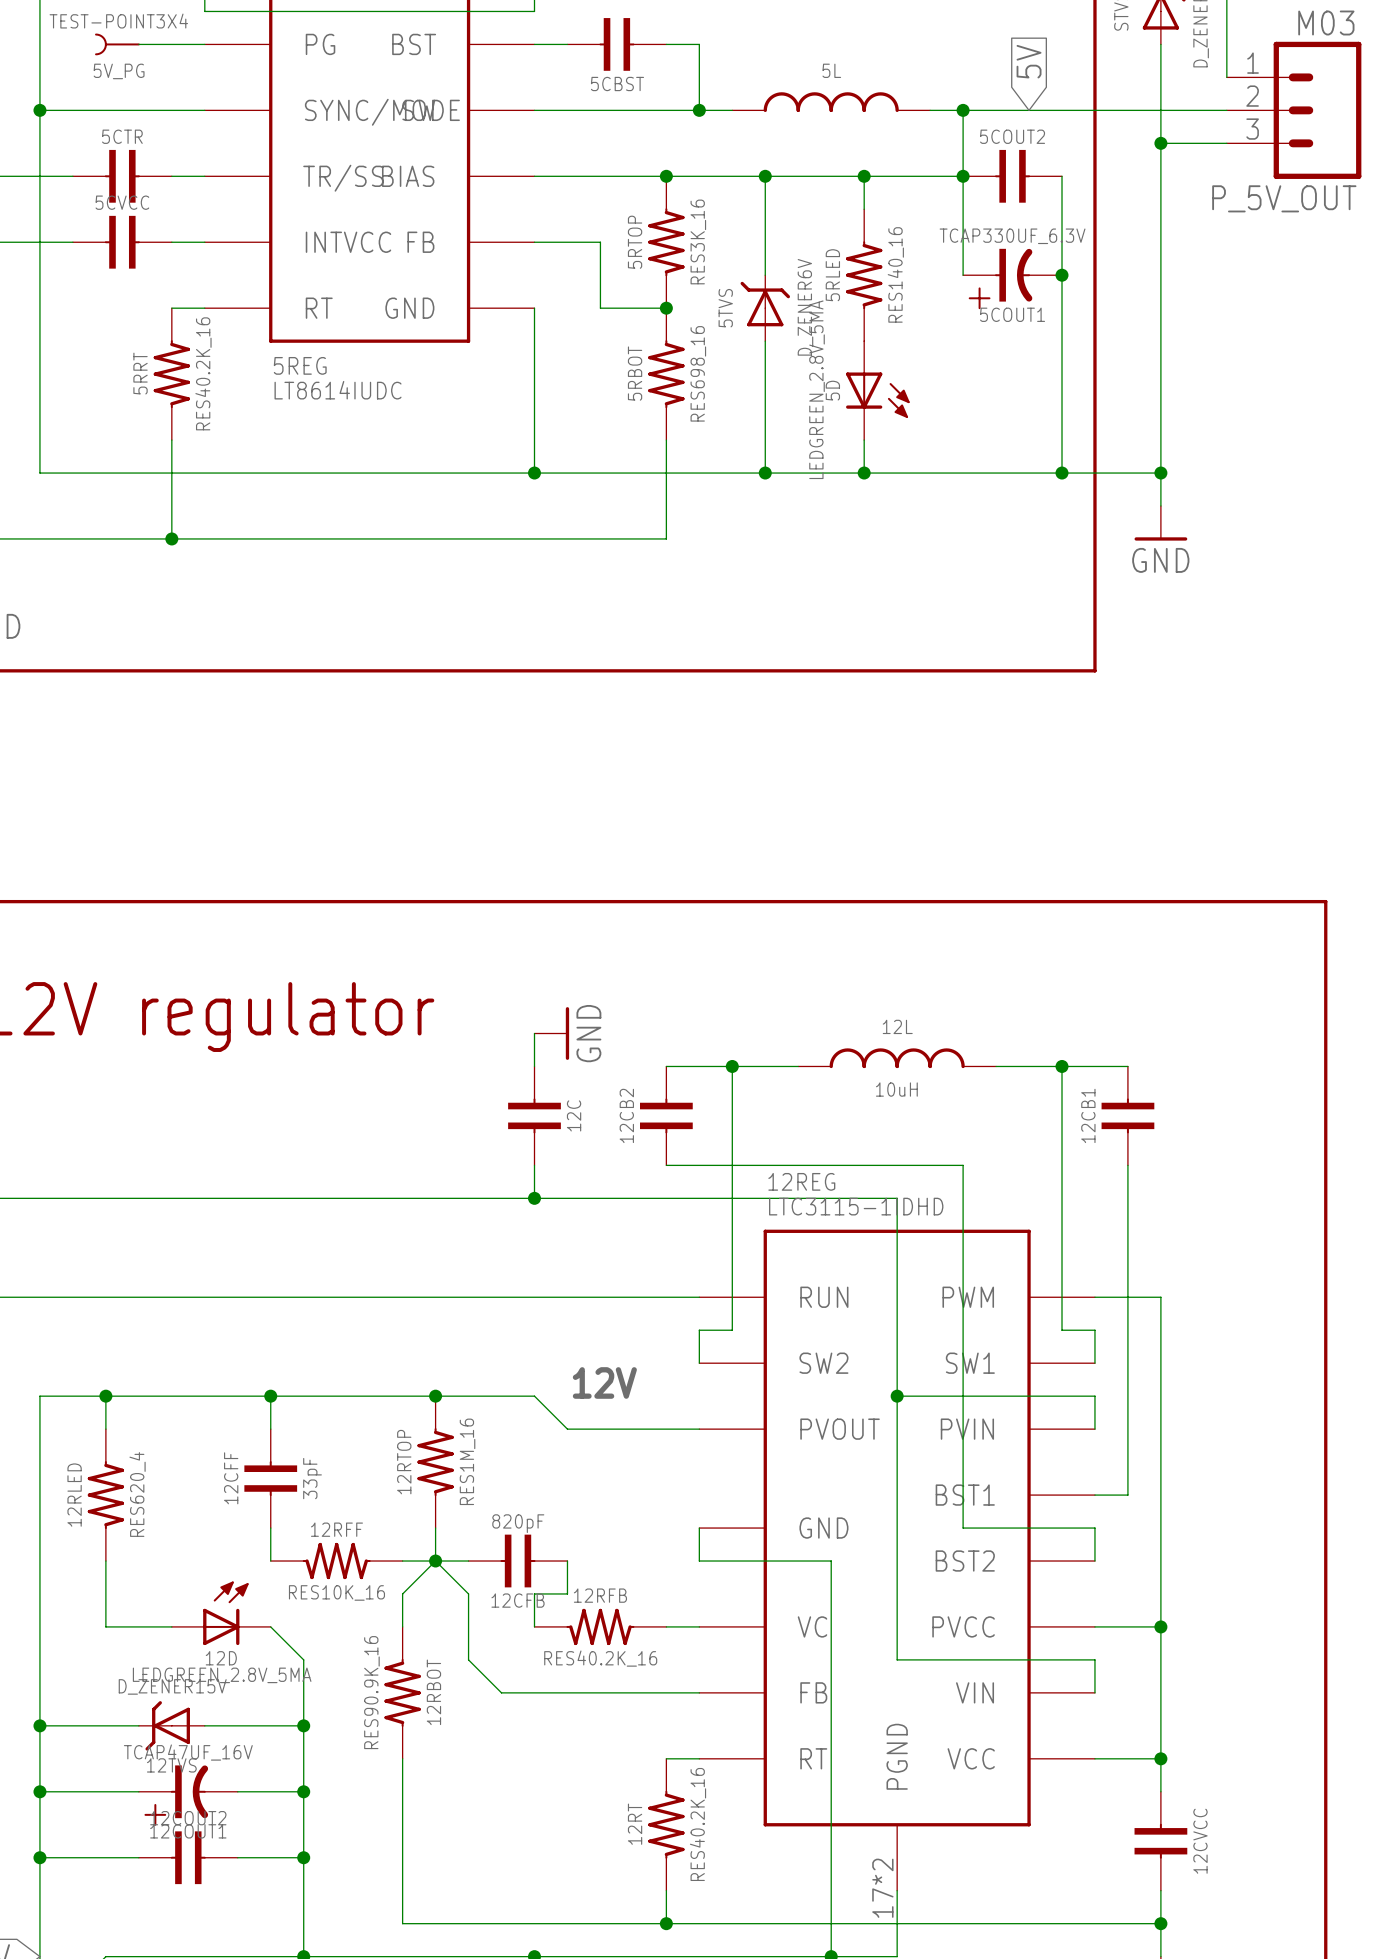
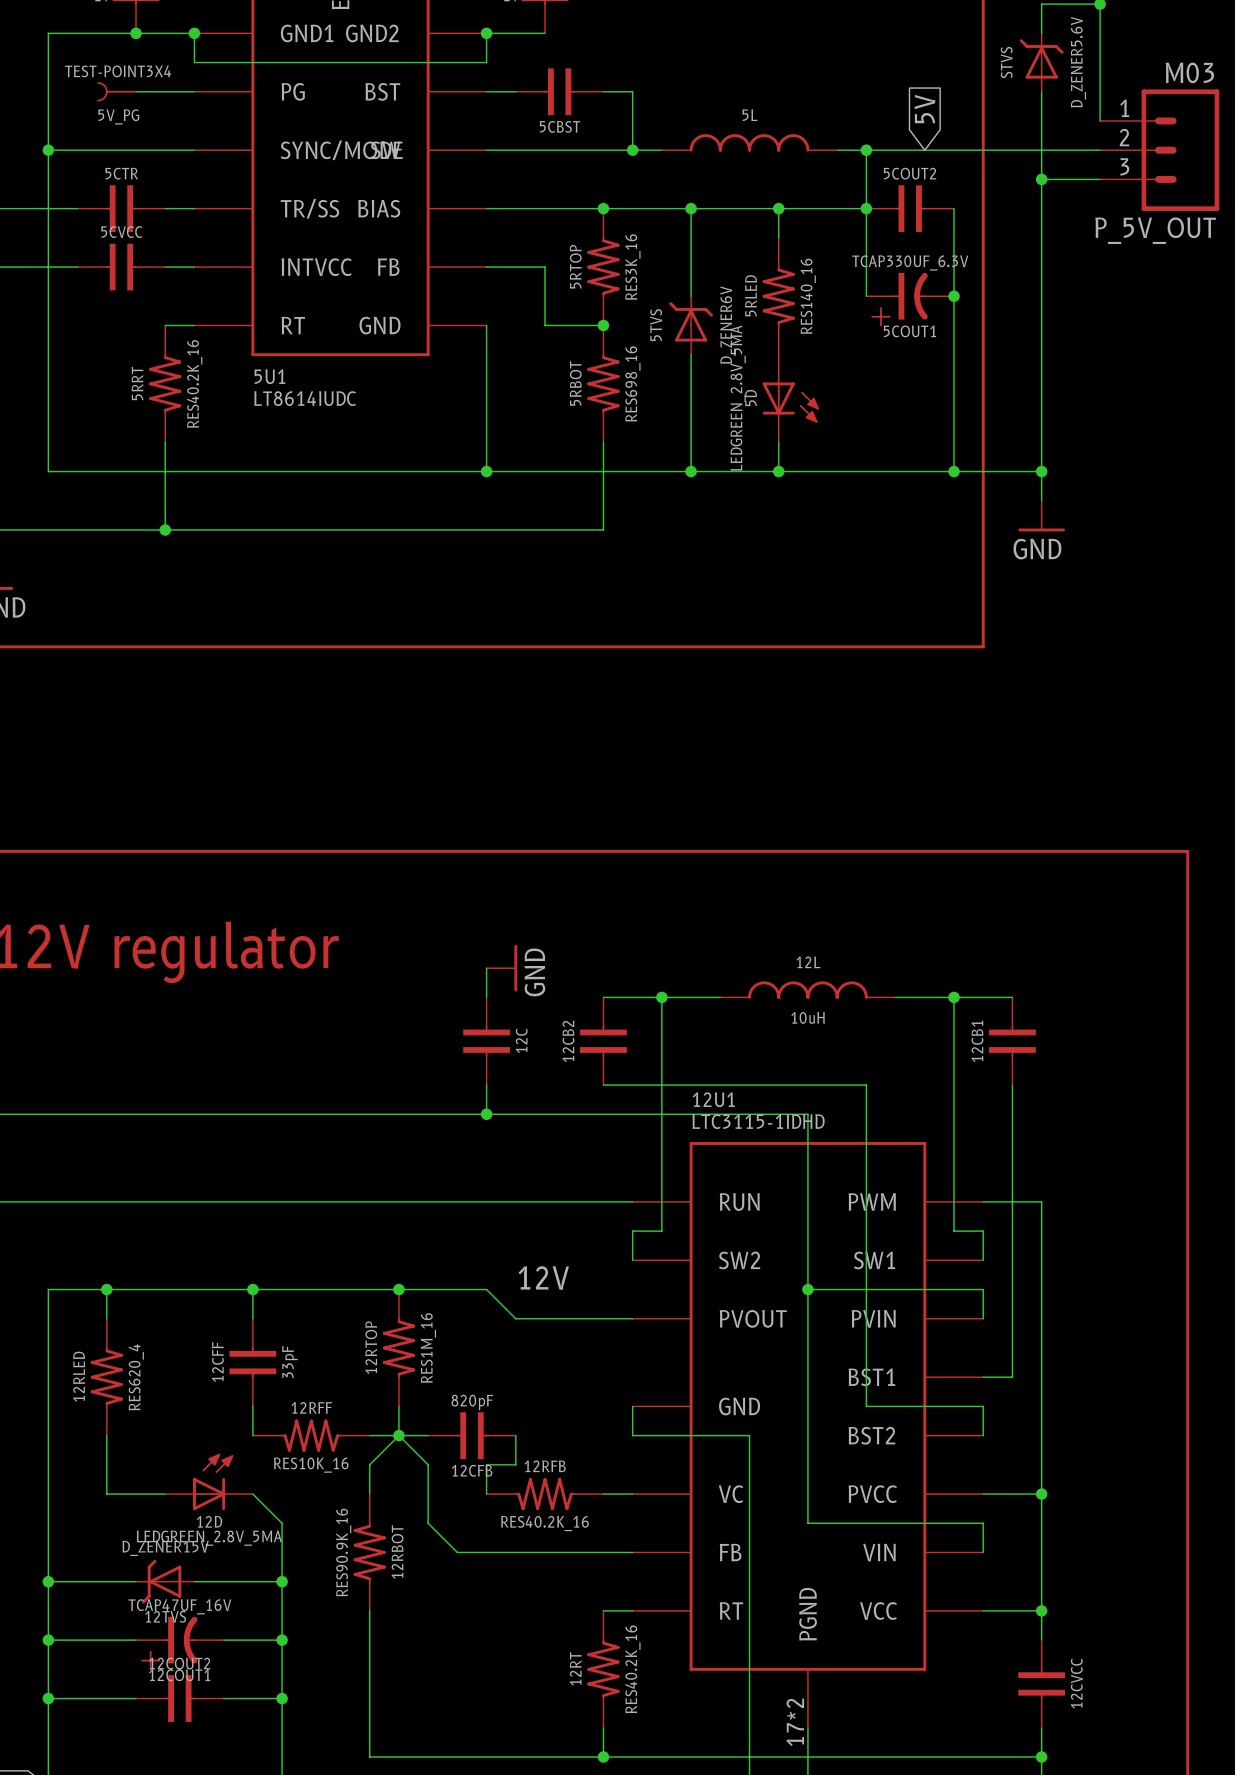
5REG name: 5REG (300, 365) -> 5U1 (269, 376)
12REG name: 12REG (801, 1181) -> 12U1 (713, 1099)

